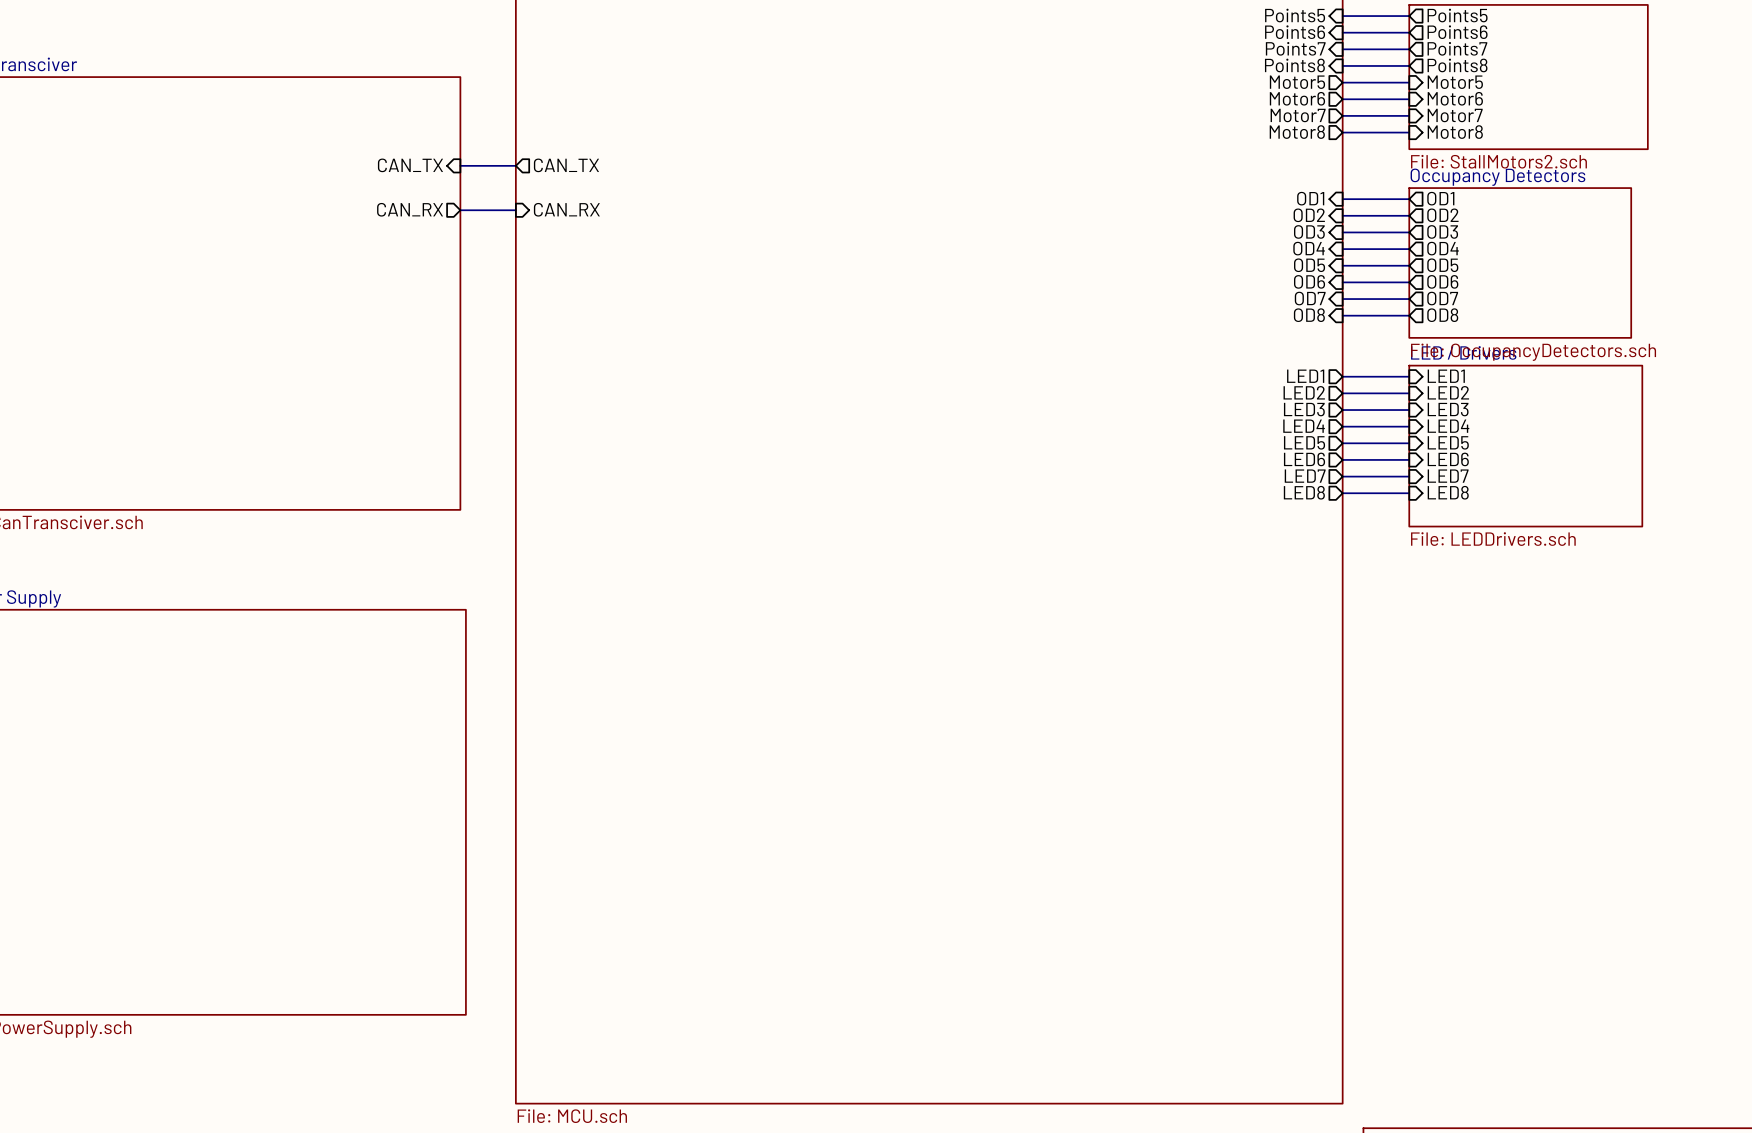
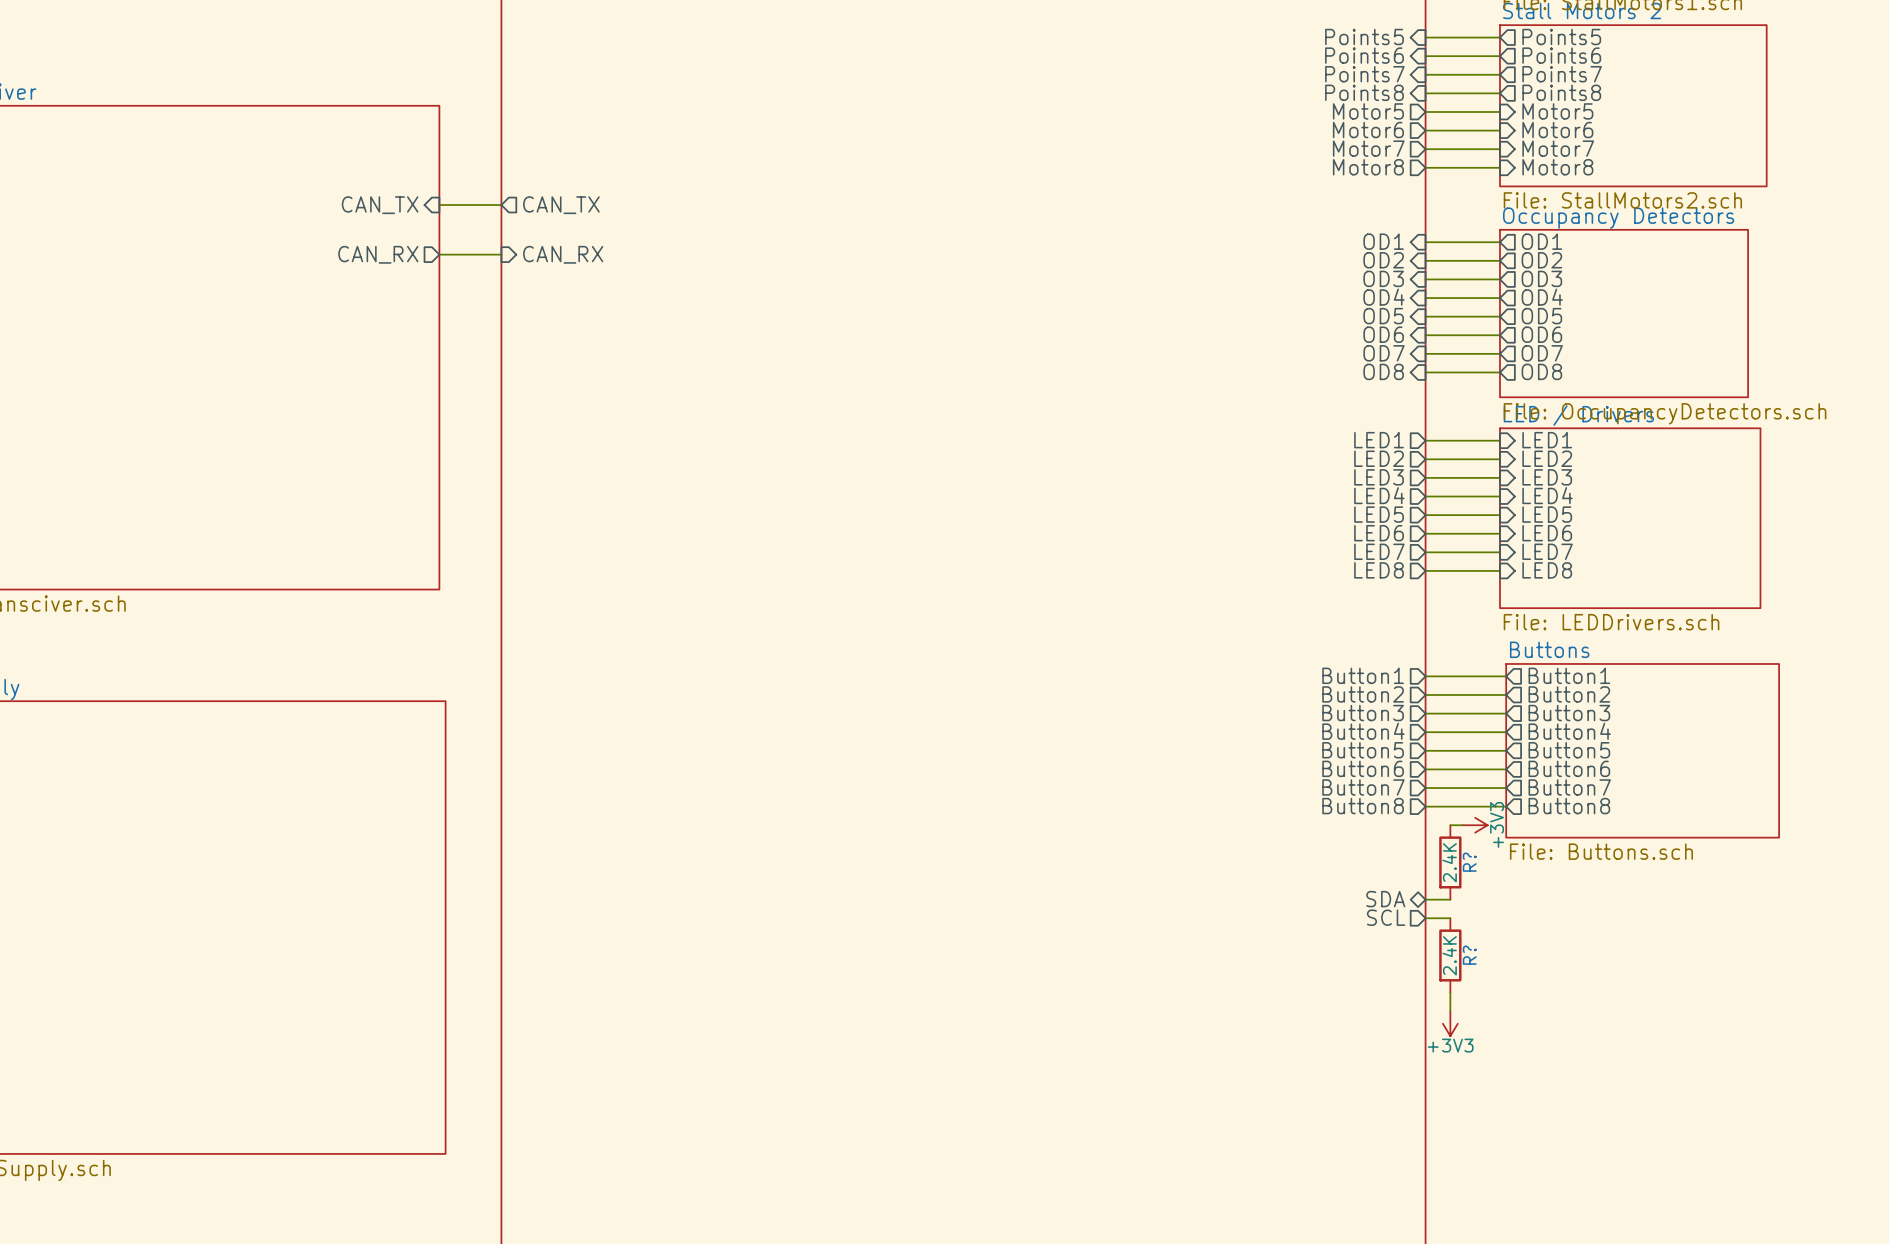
sheet pin: none -> Button1 (1363, 675)
wire: none -> (1425, 676) (1506, 676)
sheet pin: none -> Button1 (1569, 675)
sheet pin: none -> Button2 (1363, 694)
sheet pin: none -> Button2 (1569, 694)
wire: none -> (1425, 694) (1506, 694)
sheet pin: none -> Button3 (1363, 713)
wire: none -> (1425, 713) (1506, 713)
sheet pin: none -> Button3 (1569, 713)
sheet pin: none -> Button4 (1363, 731)
wire: none -> (1425, 732) (1506, 732)
sheet pin: none -> Button4 (1569, 731)
sheet pin: none -> Button5 (1363, 750)
sheet pin: none -> Button5 (1569, 750)
wire: none -> (1425, 750) (1506, 750)
sheet Buttons: none -> File: Buttons.sch (1642, 750)
sheet pin: none -> Button6 (1363, 768)
wire: none -> (1425, 769) (1506, 769)
sheet pin: none -> Button6 (1569, 768)
sheet pin: none -> Button7 (1363, 787)
wire: none -> (1425, 788) (1506, 788)
sheet pin: none -> Button7 (1569, 787)
sheet pin: none -> Button8 (1363, 806)
sheet pin: none -> Button8 (1569, 806)
wire: none -> (1425, 806) (1506, 806)
wire: none -> (1450, 825) (1462, 825)
power symbol: none -> +3V3 (1475, 825)
R?: none -> 2.4K (1450, 862)
sheet pin: none -> SDA (1385, 899)
wire: none -> (1425, 899) (1450, 899)
sheet pin: none -> SCL (1386, 917)
wire: none -> (1425, 918) (1450, 918)
R?: none -> 2.4K (1450, 955)
wire: none -> (1450, 992) (1450, 1011)
power symbol: none -> +3V3 (1450, 1023)

